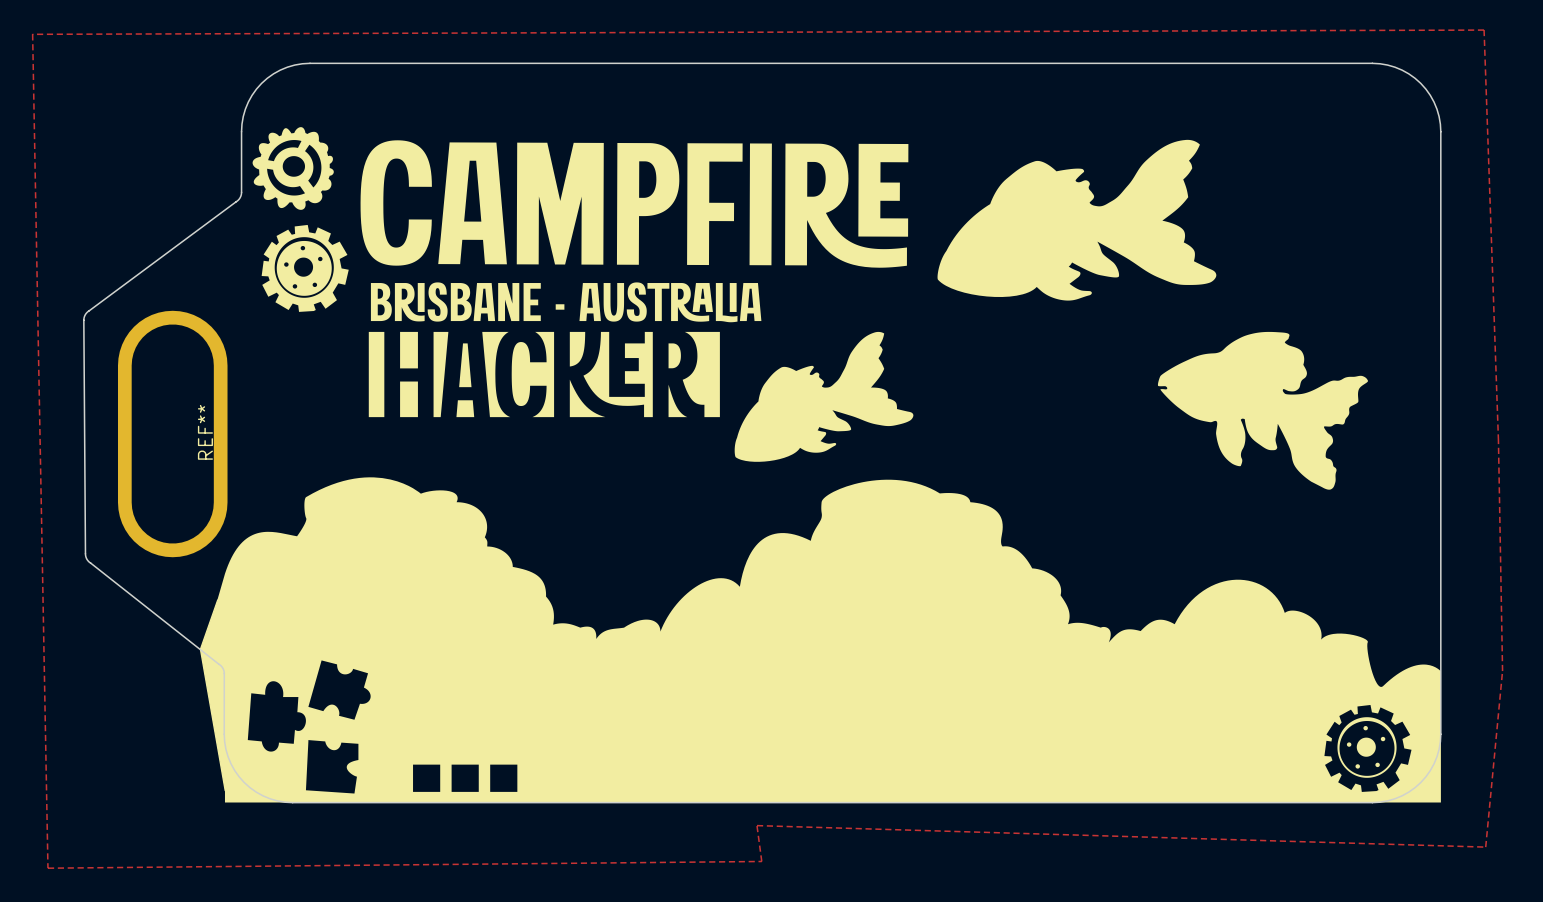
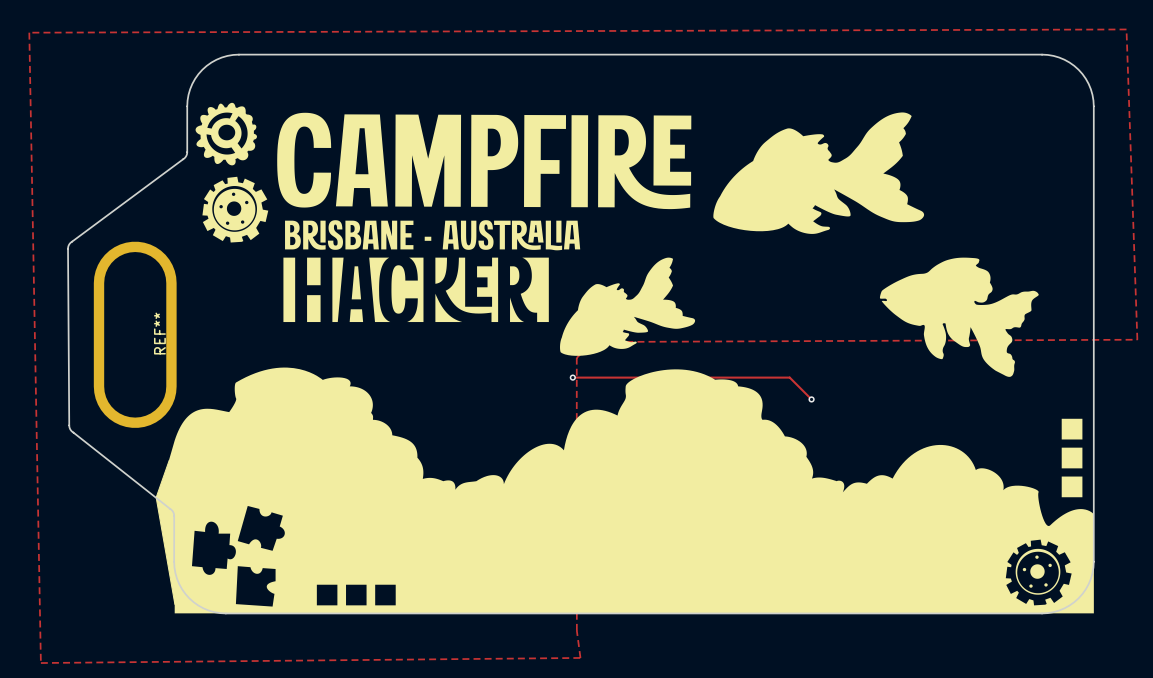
zone outline: (1498, 440) (1502, 671) (1485, 847) (756, 825) -> (1137, 339) (593, 342) (576, 357) (576, 630)
track: none -> (572, 377) (789, 377) (811, 399)
via: none -> (572, 377)
via: none -> (811, 399)
drawing: none -> [1061, 418, 1083, 498]

